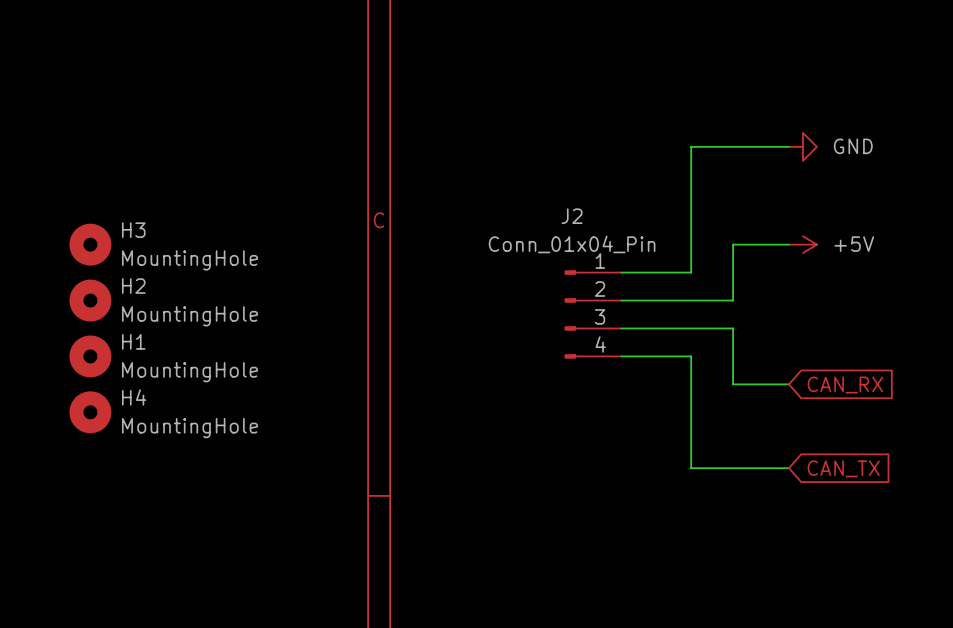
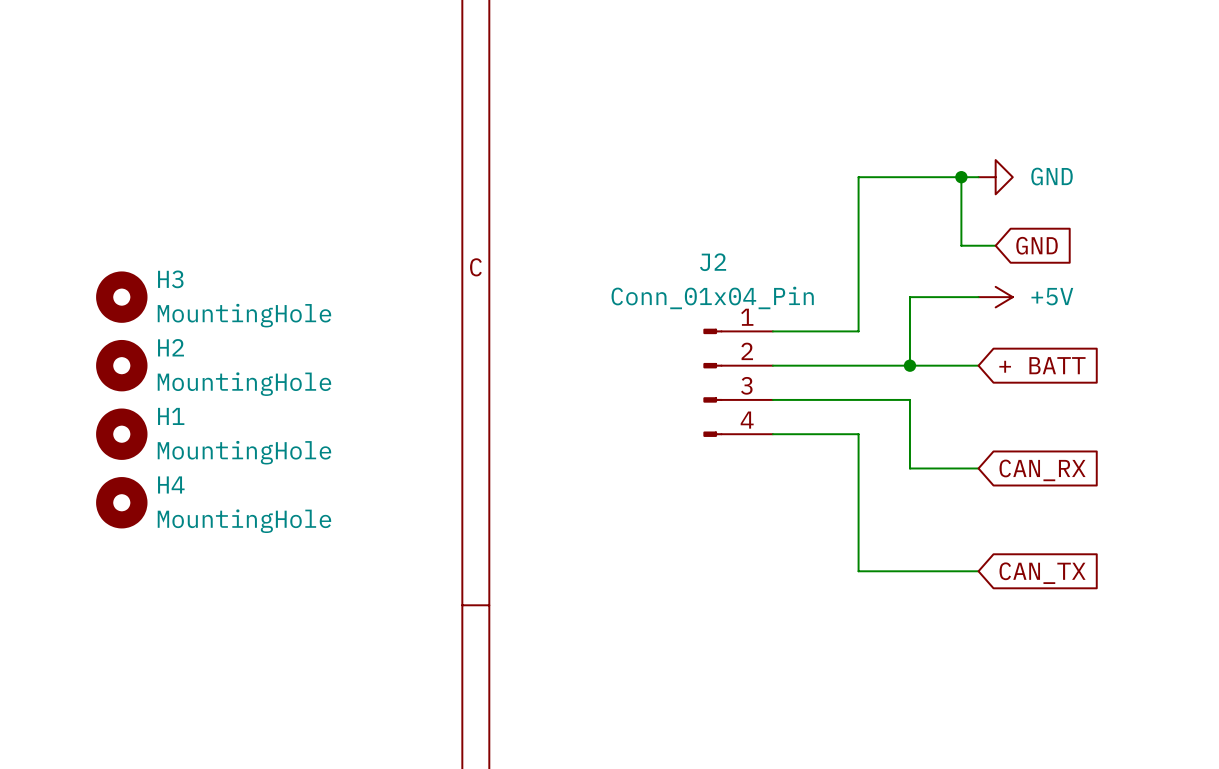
wire: none -> (961, 177) (961, 245) (995, 245)
junction: none -> (961, 177)
global label: none -> GND (1037, 245)
wire: none -> (909, 365) (978, 365)
junction: none -> (909, 365)
global label: none -> + BATT (1042, 365)

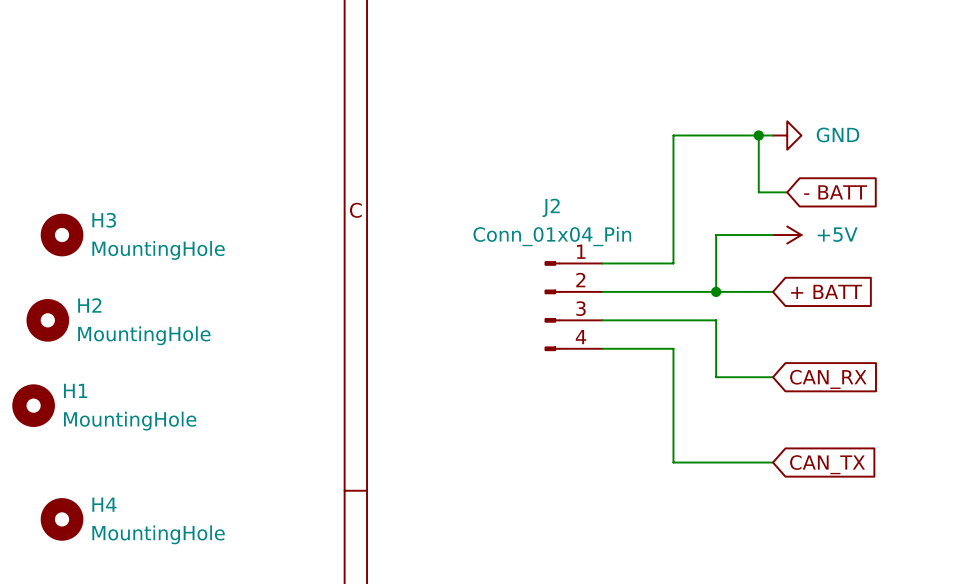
global label: GND (1037, 245) -> - BATT (835, 192)
H2 position: (121, 365) -> (47, 320)
H1 position: (121, 434) -> (33, 405)
H4 position: (121, 502) -> (62, 519)

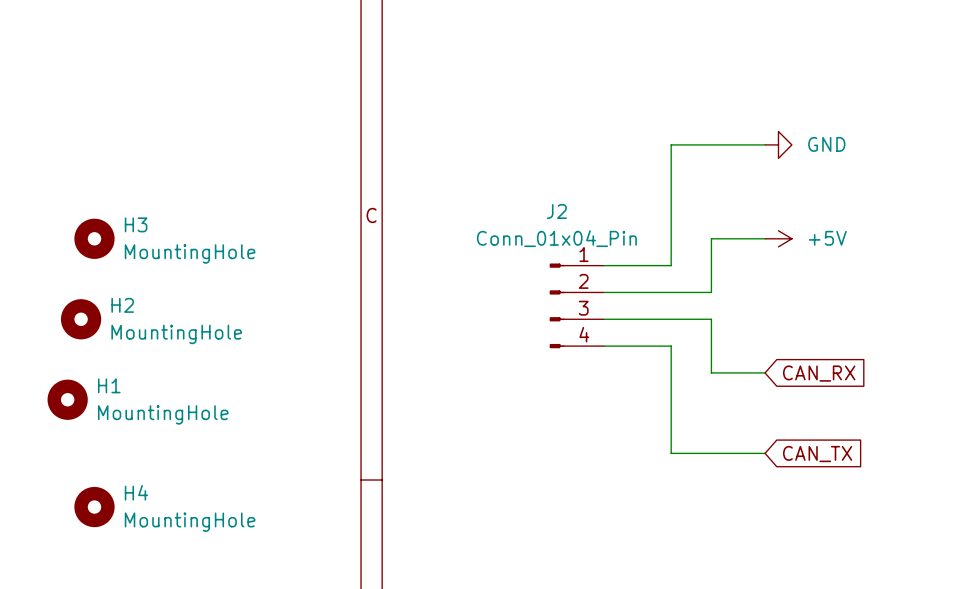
wire: (758, 135) (758, 192) (787, 192) -> none
junction: (758, 135) -> none
global label: - BATT (835, 192) -> none
wire: (716, 291) (772, 291) -> none
junction: (716, 291) -> none
global label: + BATT (826, 291) -> none

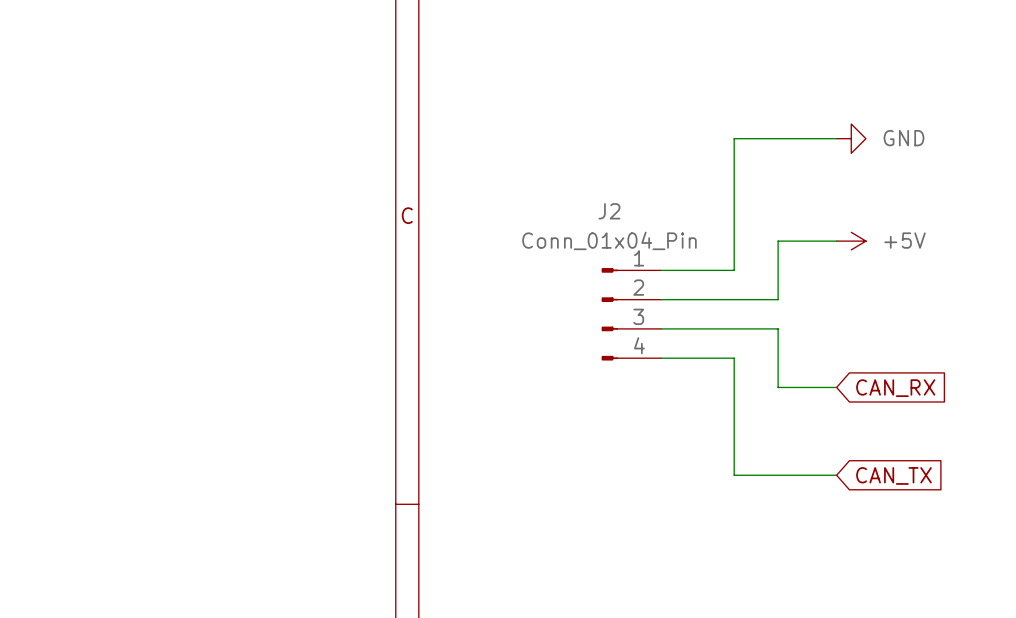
H3: MountingHole (94, 238) -> none
H2: MountingHole (81, 319) -> none
H1: MountingHole (67, 399) -> none
H4: MountingHole (94, 507) -> none

